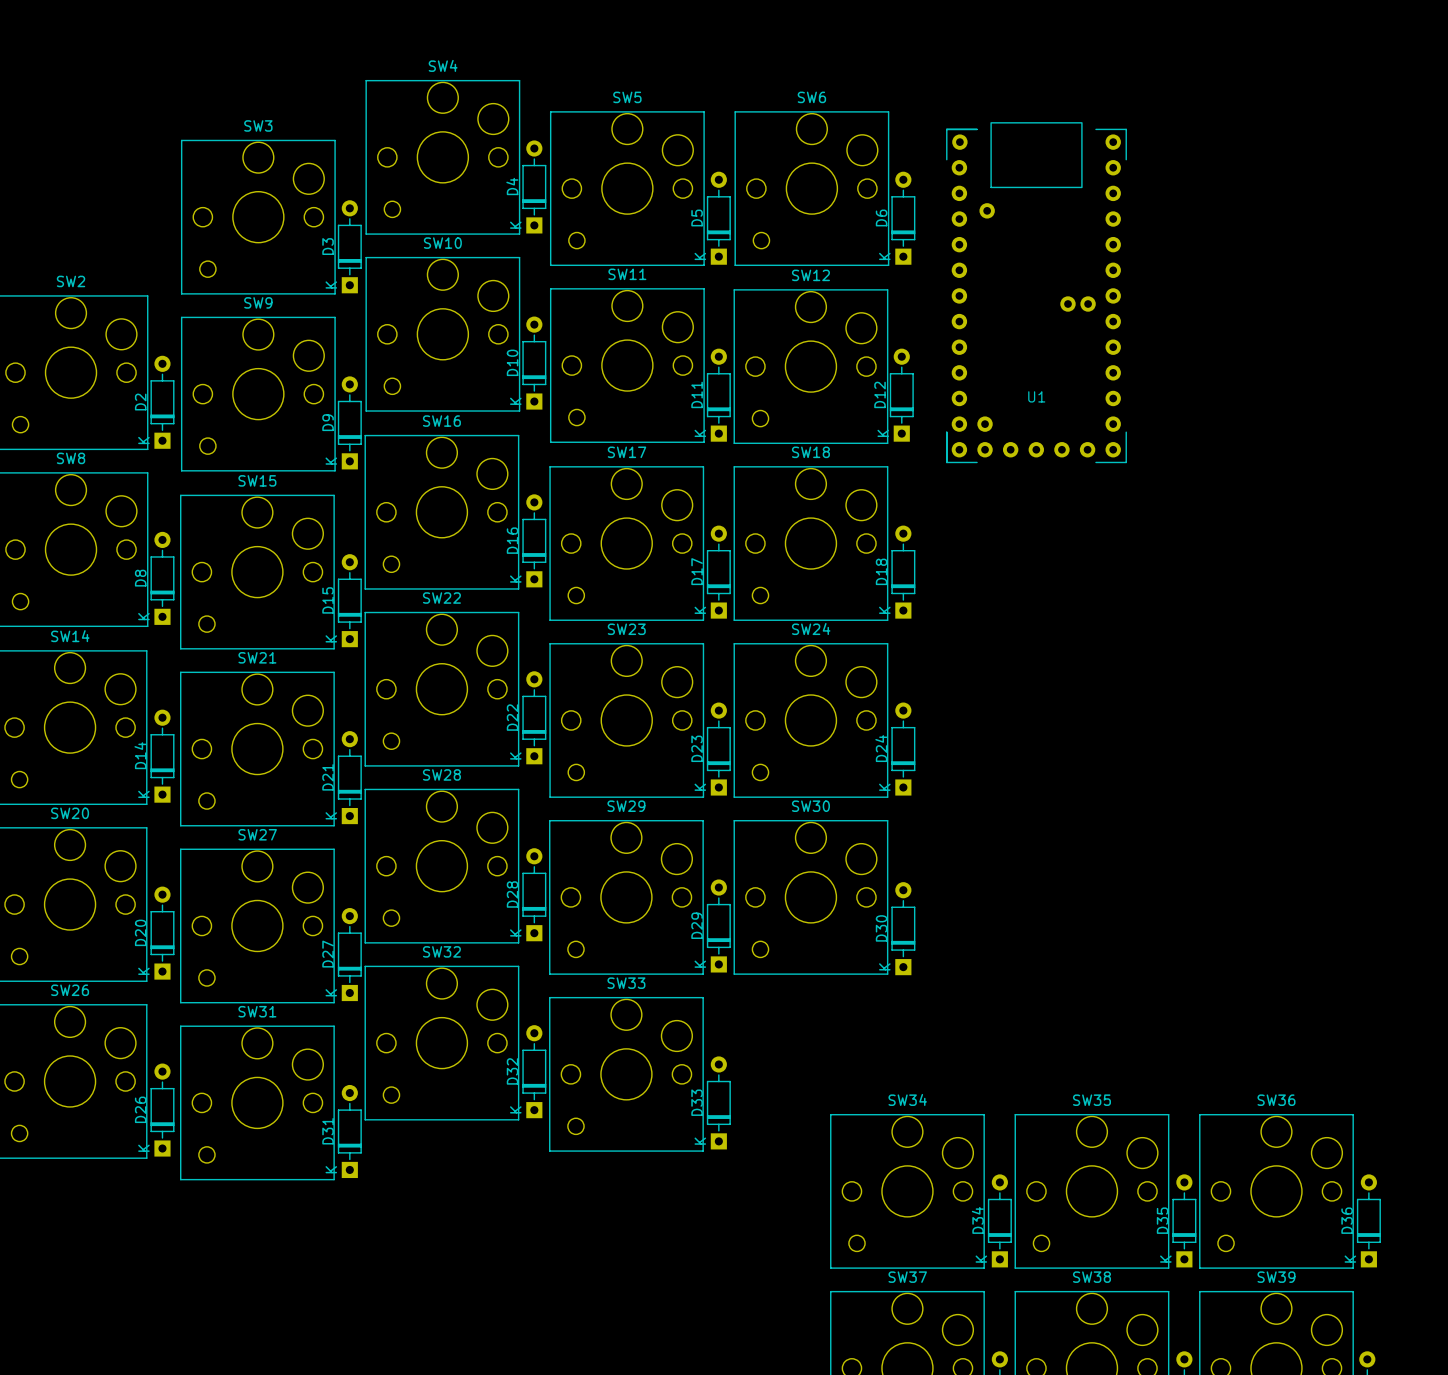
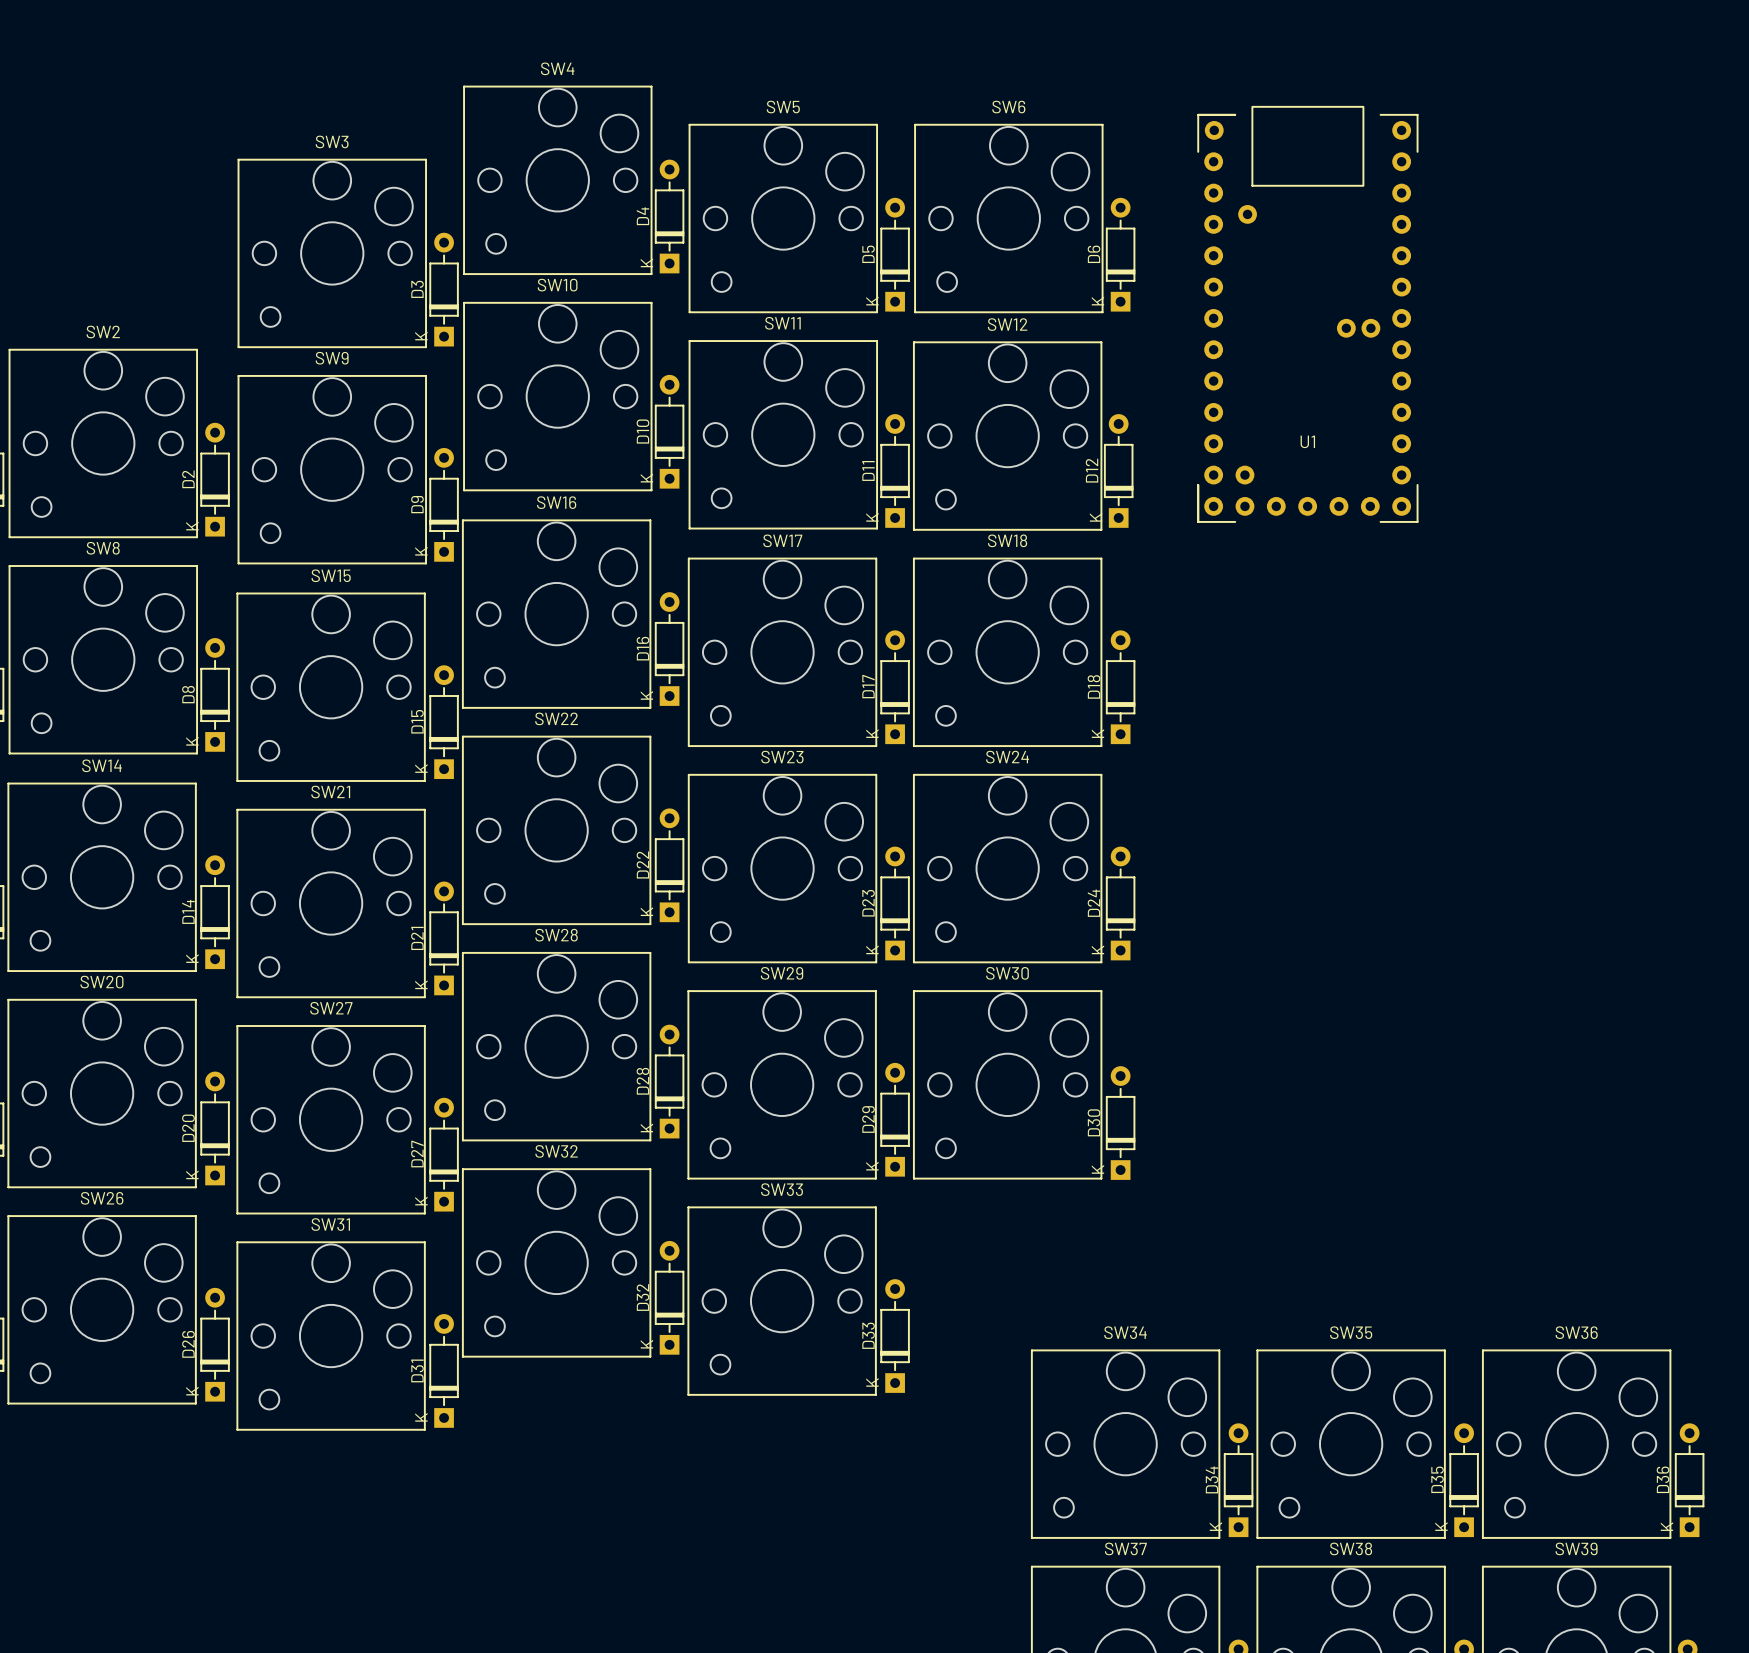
U1 position: (1036, 292) -> (1307, 314)

